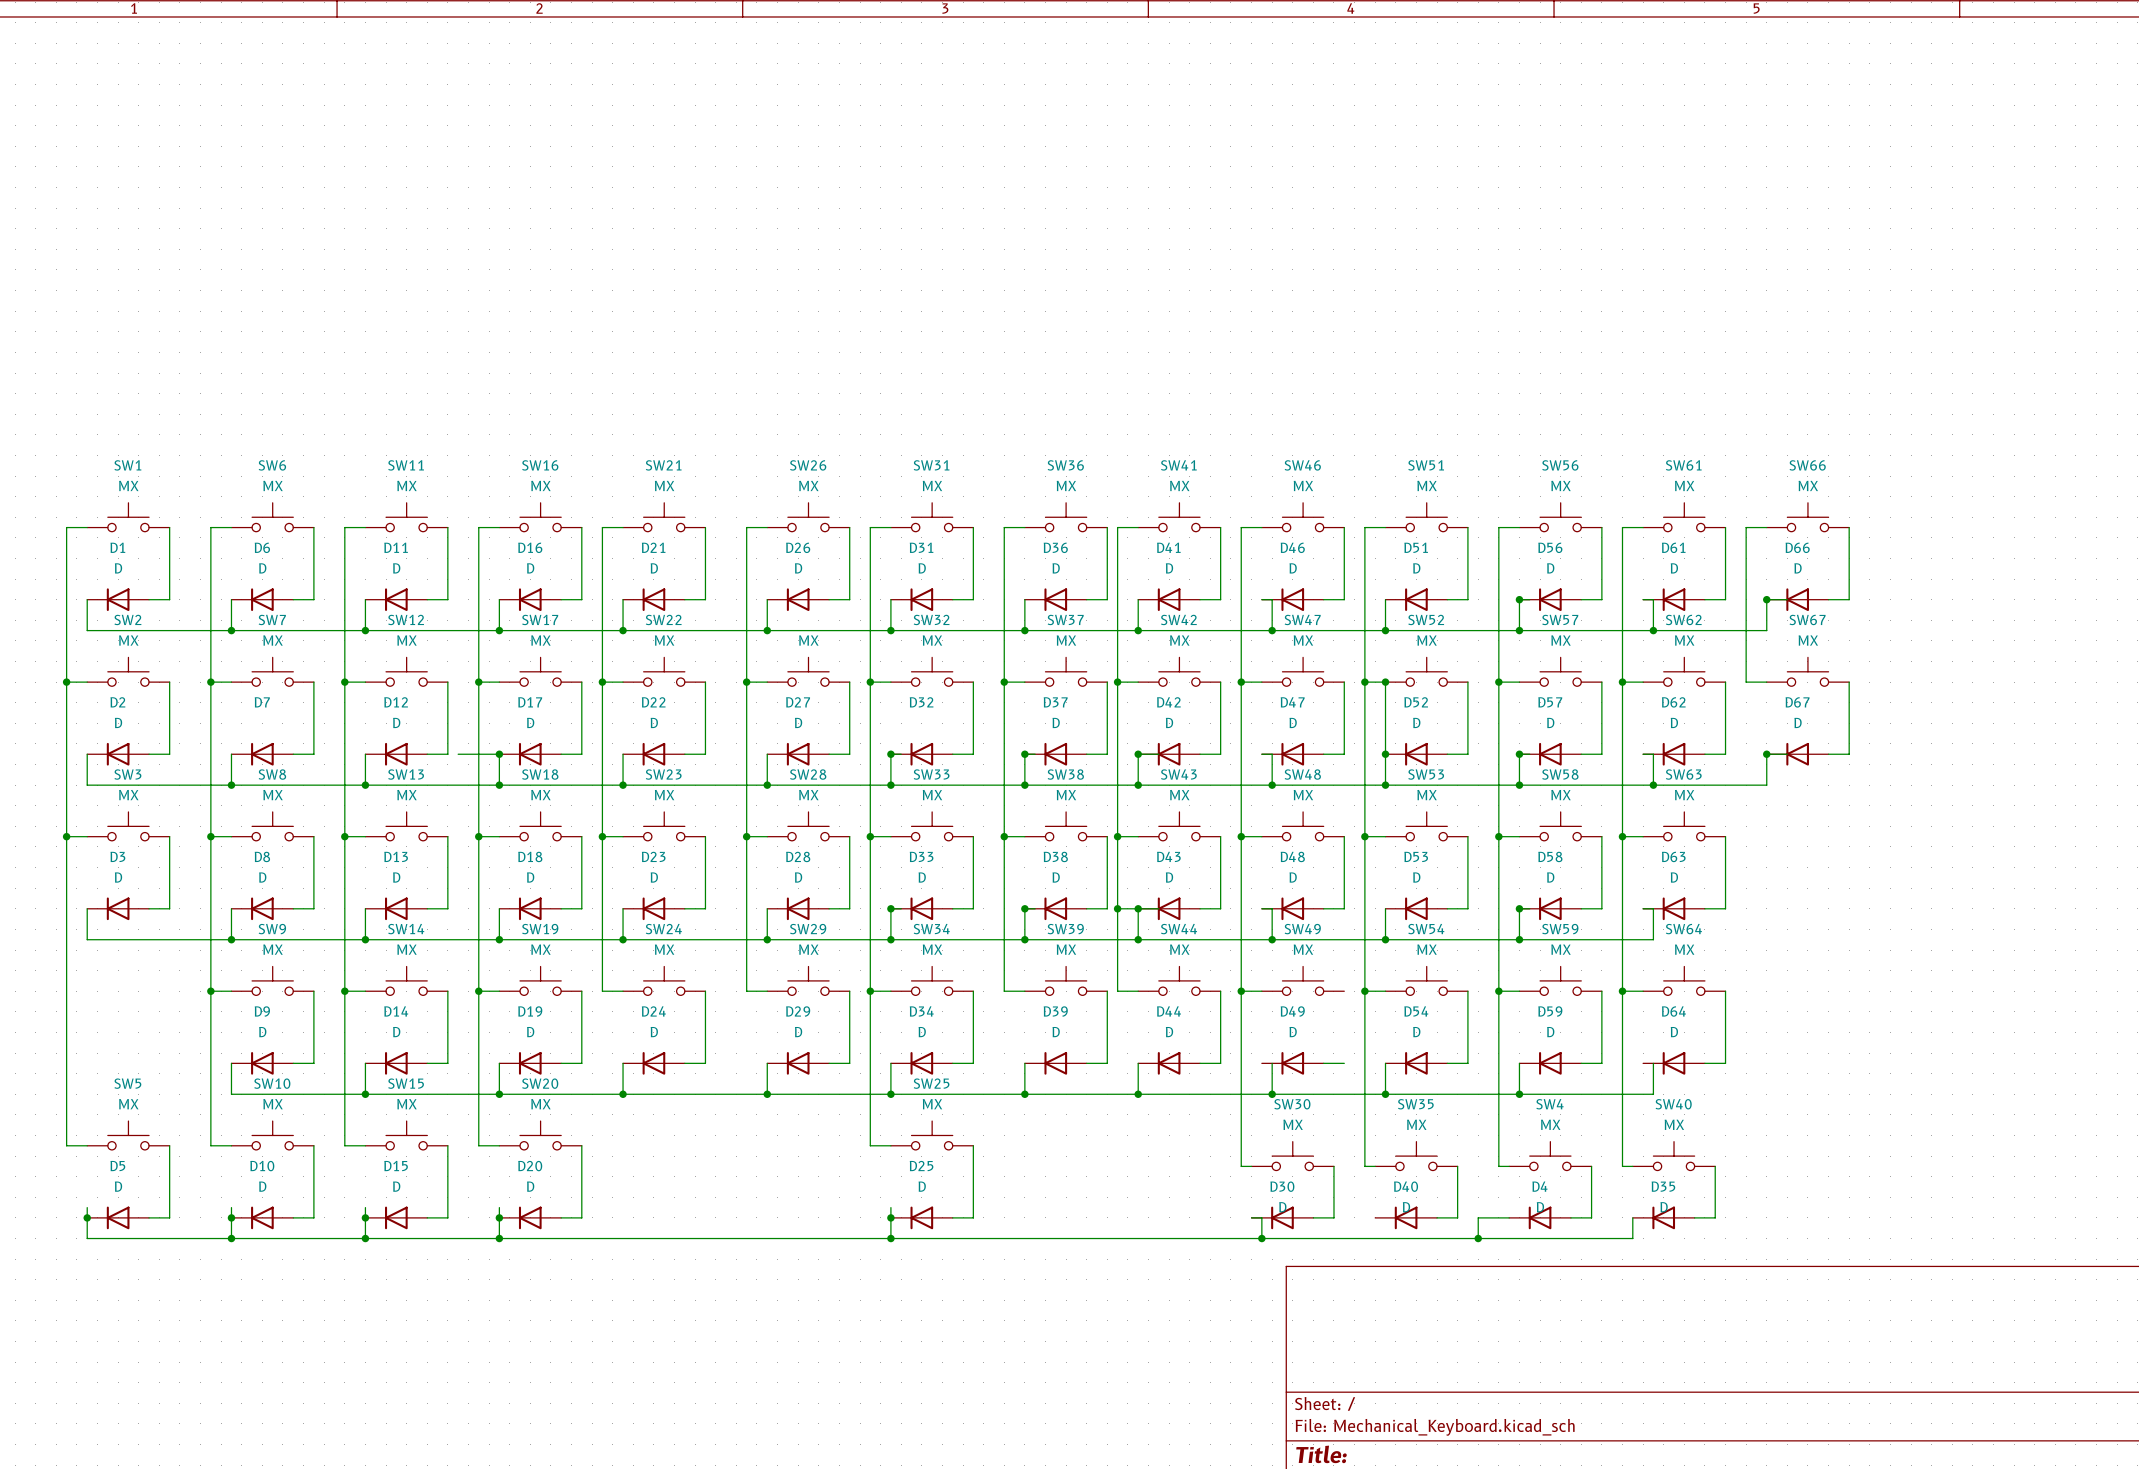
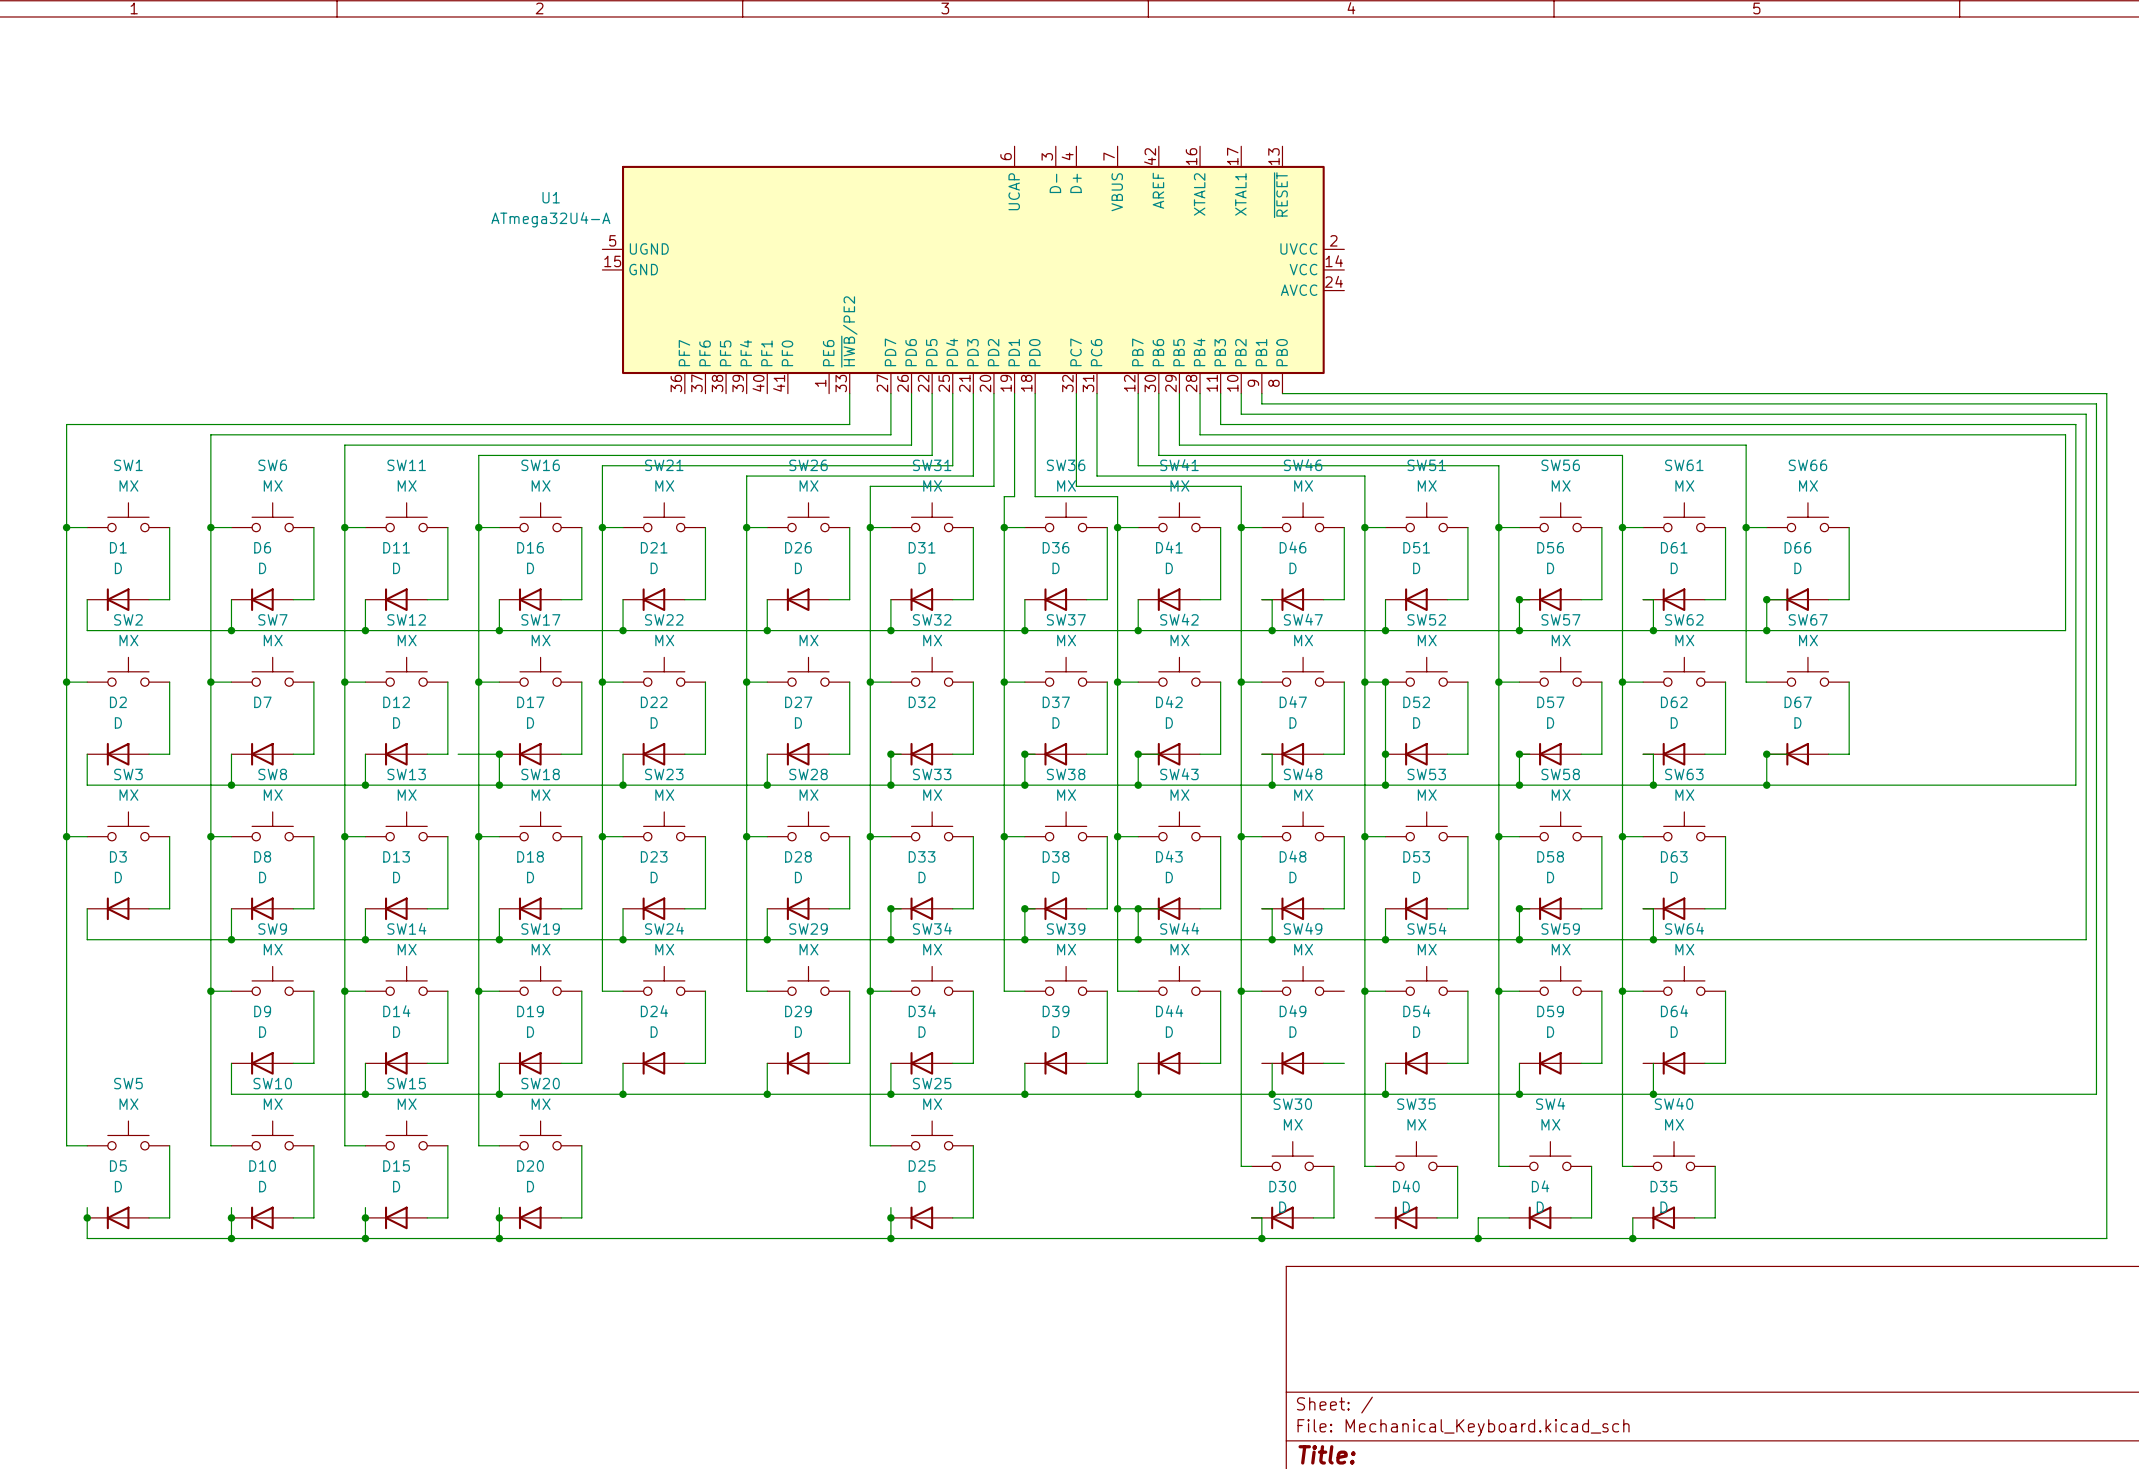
U1: none -> ATmega32U4-A (973, 269)
wire: none -> (849, 393) (849, 424) (66, 424) (66, 527)
wire: none -> (890, 393) (890, 434) (210, 434) (210, 527)
wire: none -> (911, 393) (911, 445) (344, 445) (344, 527)
wire: none -> (932, 393) (932, 455) (478, 455) (478, 527)
wire: none -> (952, 393) (952, 465) (602, 465) (602, 527)
wire: none -> (973, 393) (973, 476) (746, 476) (746, 527)
wire: none -> (993, 393) (993, 486) (870, 486) (870, 527)
wire: none -> (1014, 393) (1014, 496) (1004, 496) (1004, 527)
wire: none -> (1035, 393) (1035, 496) (1117, 496) (1117, 527)
wire: none -> (1076, 393) (1076, 486) (1241, 486) (1241, 527)
wire: none -> (1097, 393) (1097, 476) (1364, 476) (1364, 527)
wire: none -> (1138, 393) (1138, 465) (1498, 465) (1498, 527)
wire: none -> (1158, 393) (1158, 455) (1622, 455) (1622, 527)
wire: none -> (1179, 393) (1179, 445) (1746, 445) (1746, 527)
wire: none -> (1200, 393) (1200, 434) (2065, 434) (2065, 630) (1766, 630)
wire: none -> (1220, 393) (1220, 424) (2075, 424) (2075, 785) (1766, 785)
wire: none -> (1241, 393) (1241, 414) (2086, 414) (2086, 939) (1653, 939)
wire: none -> (1261, 393) (1261, 403) (2096, 403) (2096, 1094) (1653, 1094)
wire: none -> (1282, 393) (2106, 393) (2106, 1238) (1632, 1238)
junction: none -> (66, 527)
junction: none -> (210, 527)
junction: none -> (344, 527)
junction: none -> (478, 527)
junction: none -> (602, 527)
junction: none -> (746, 527)
junction: none -> (870, 527)
junction: none -> (1004, 527)
junction: none -> (1117, 527)
junction: none -> (1241, 527)
junction: none -> (1364, 527)
junction: none -> (1498, 527)
junction: none -> (1622, 527)
junction: none -> (1746, 527)
junction: none -> (1766, 630)
junction: none -> (1766, 785)
junction: none -> (1653, 939)
junction: none -> (1653, 1094)
junction: none -> (1632, 1238)

